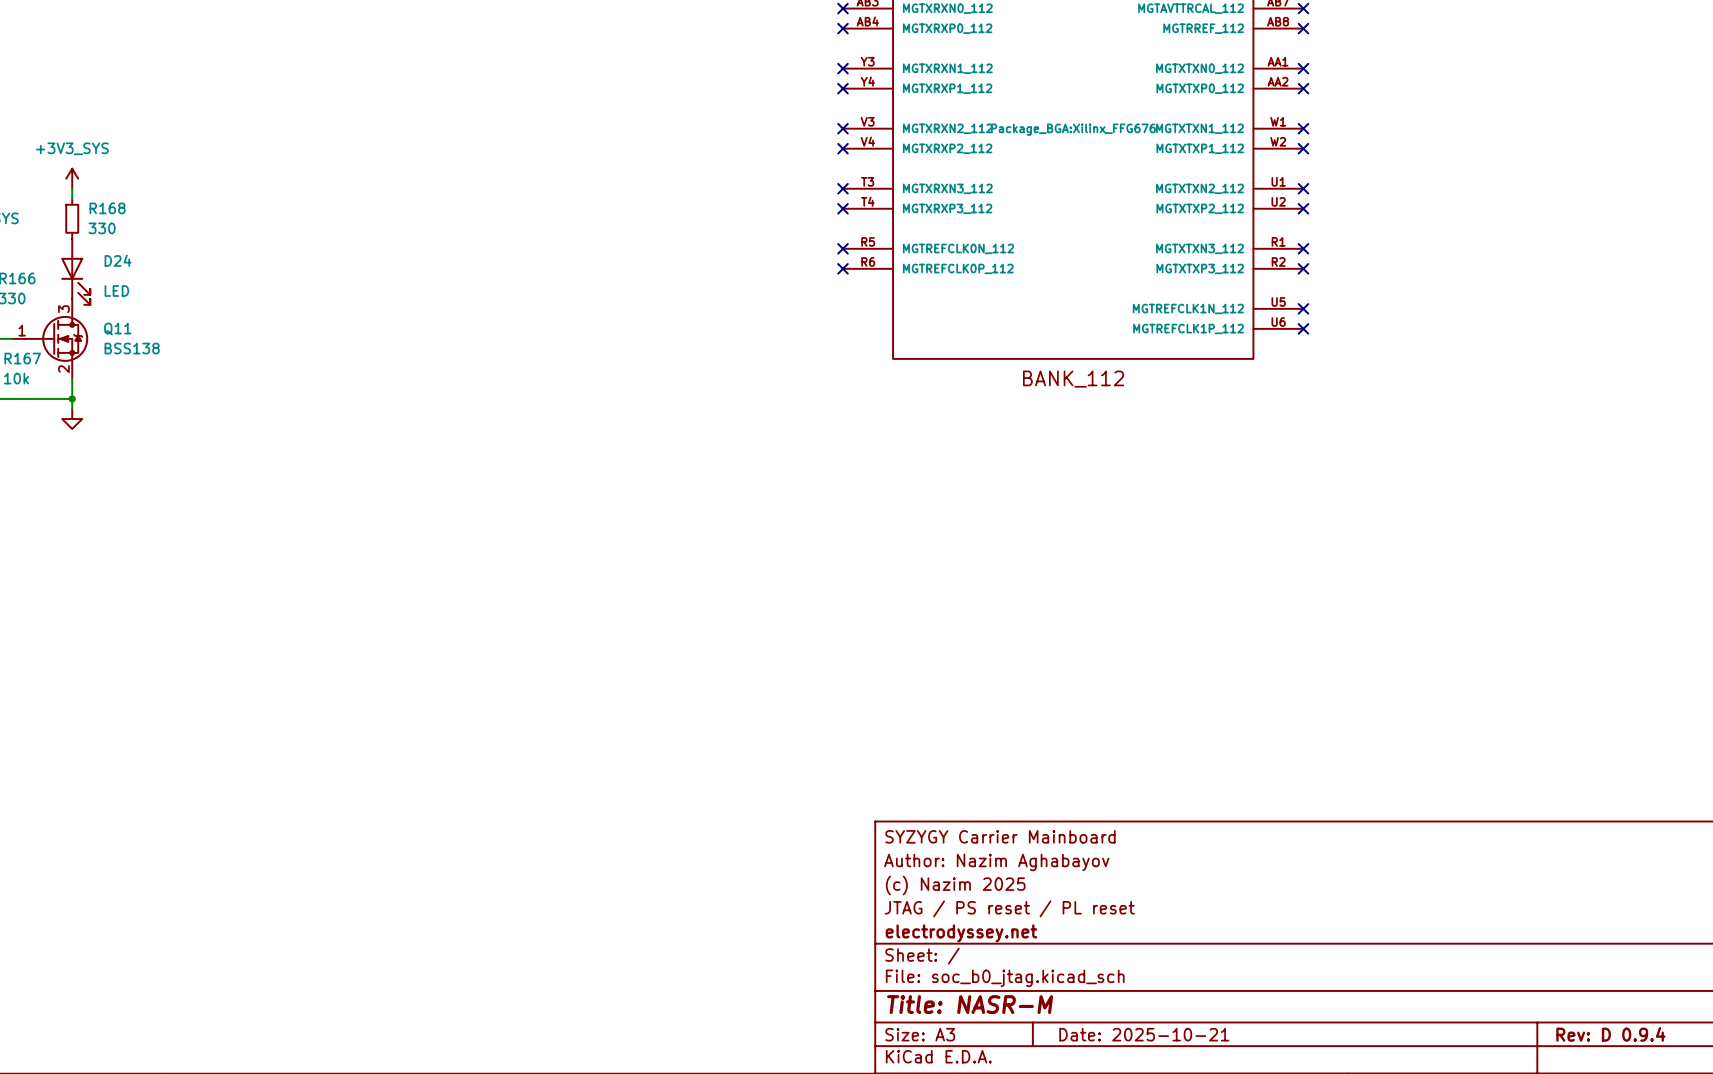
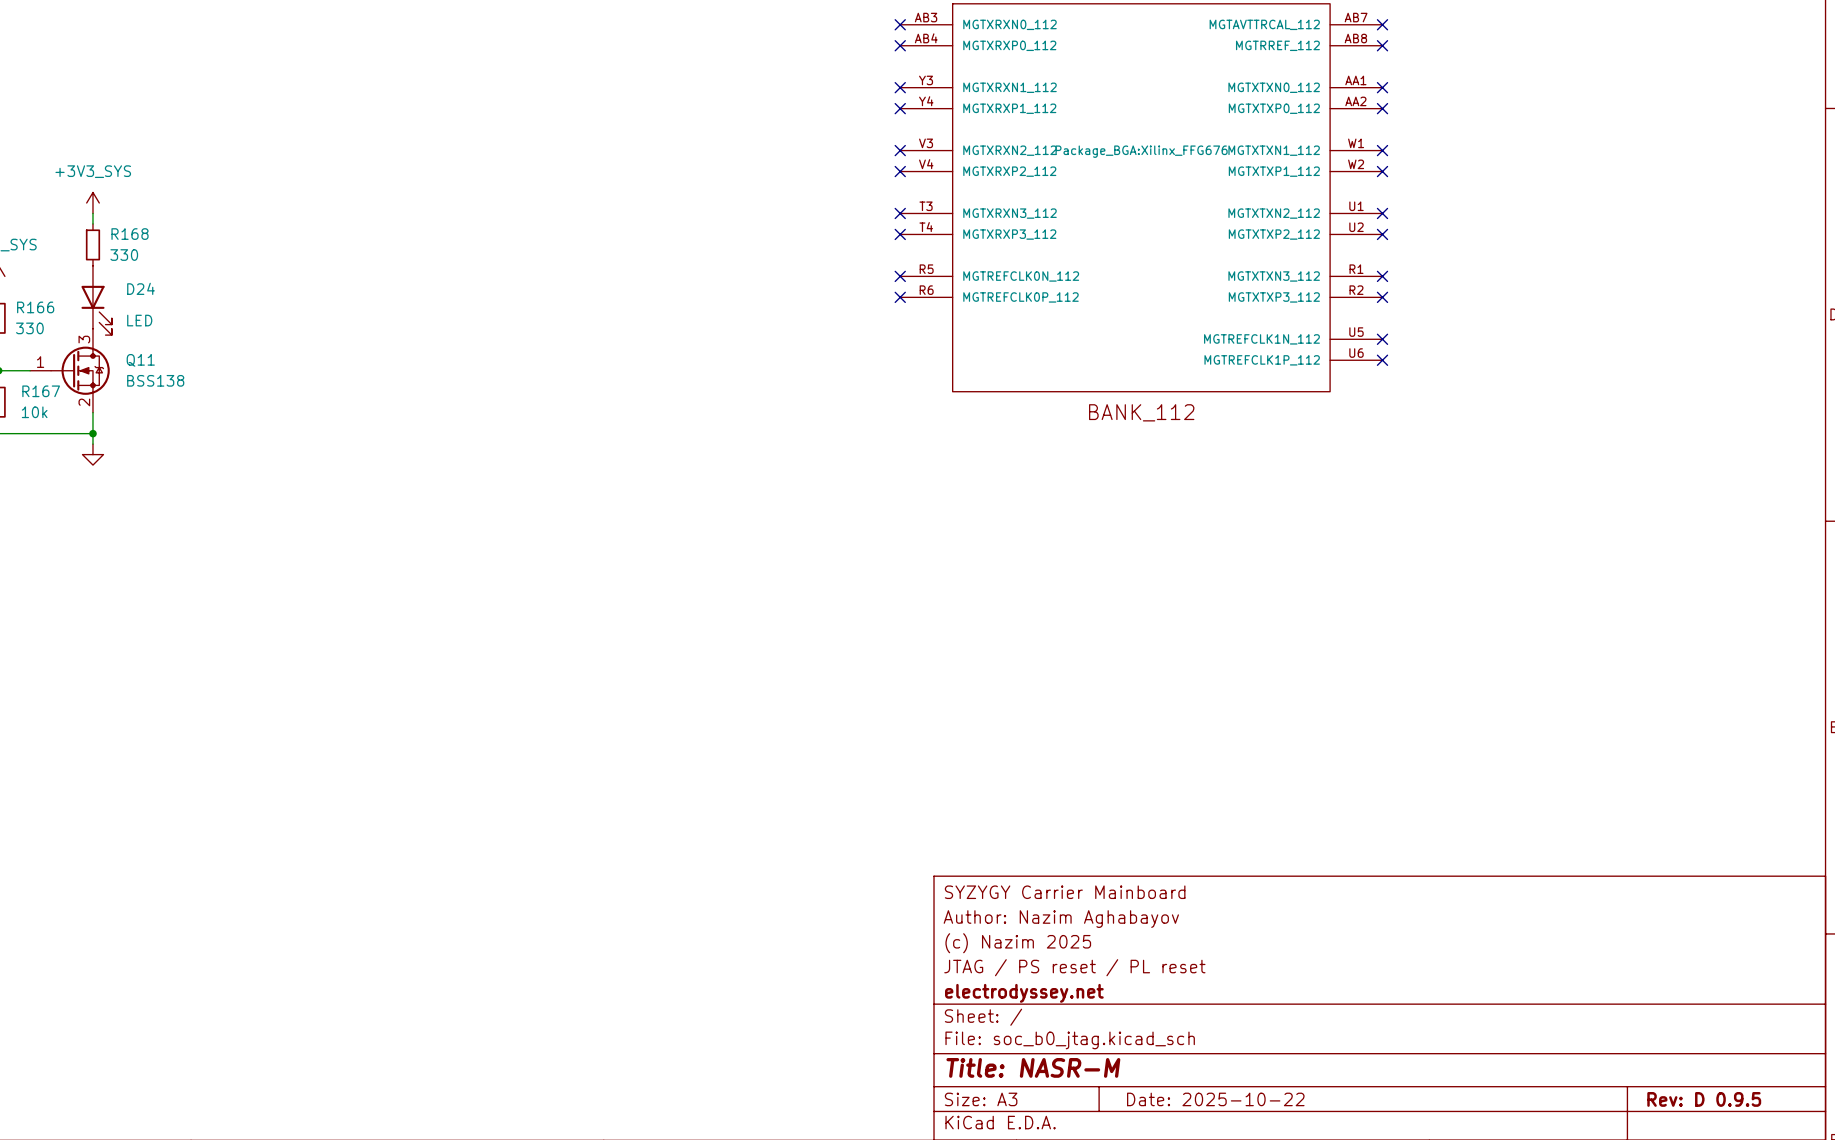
title block: Date: 2025-10-21 (1144, 1034) -> Date: 2025-10-22 (1215, 1099)
title block: Rev: D 0.9.4 (1610, 1034) -> Rev: D 0.9.5 (1704, 1099)

